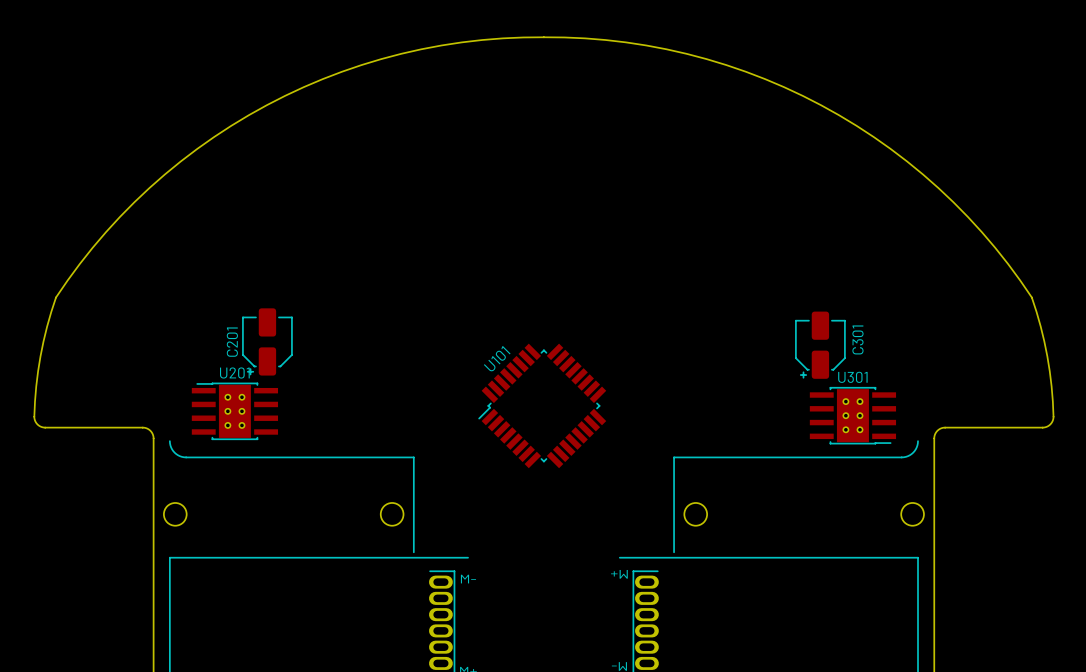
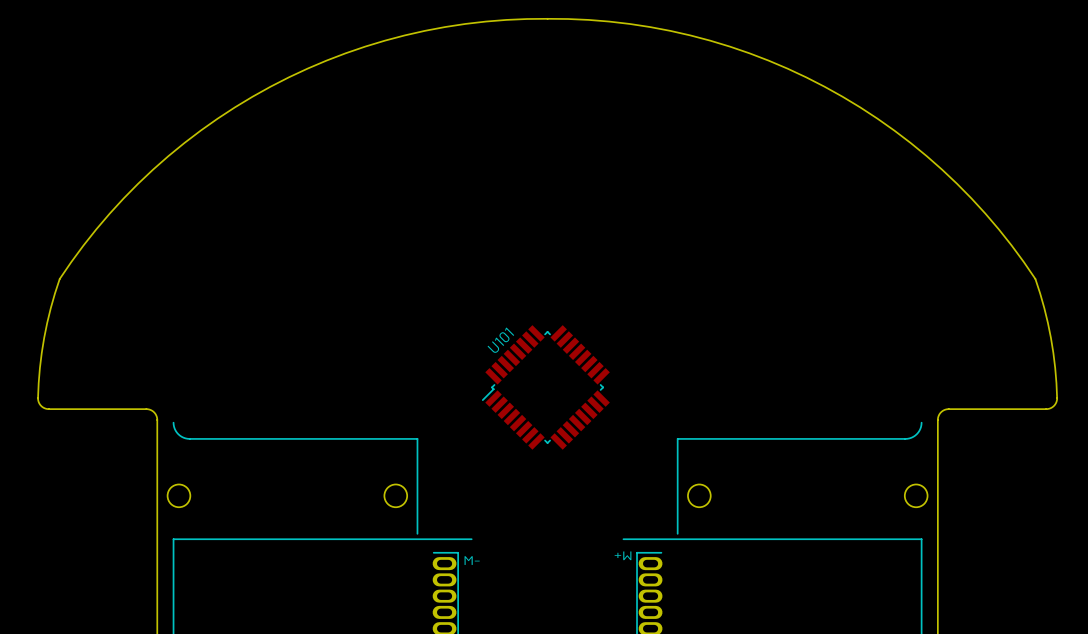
C201: (267, 341) -> none
C301: (820, 345) -> none
U201: (234, 411) -> none
U301: (852, 415) -> none

